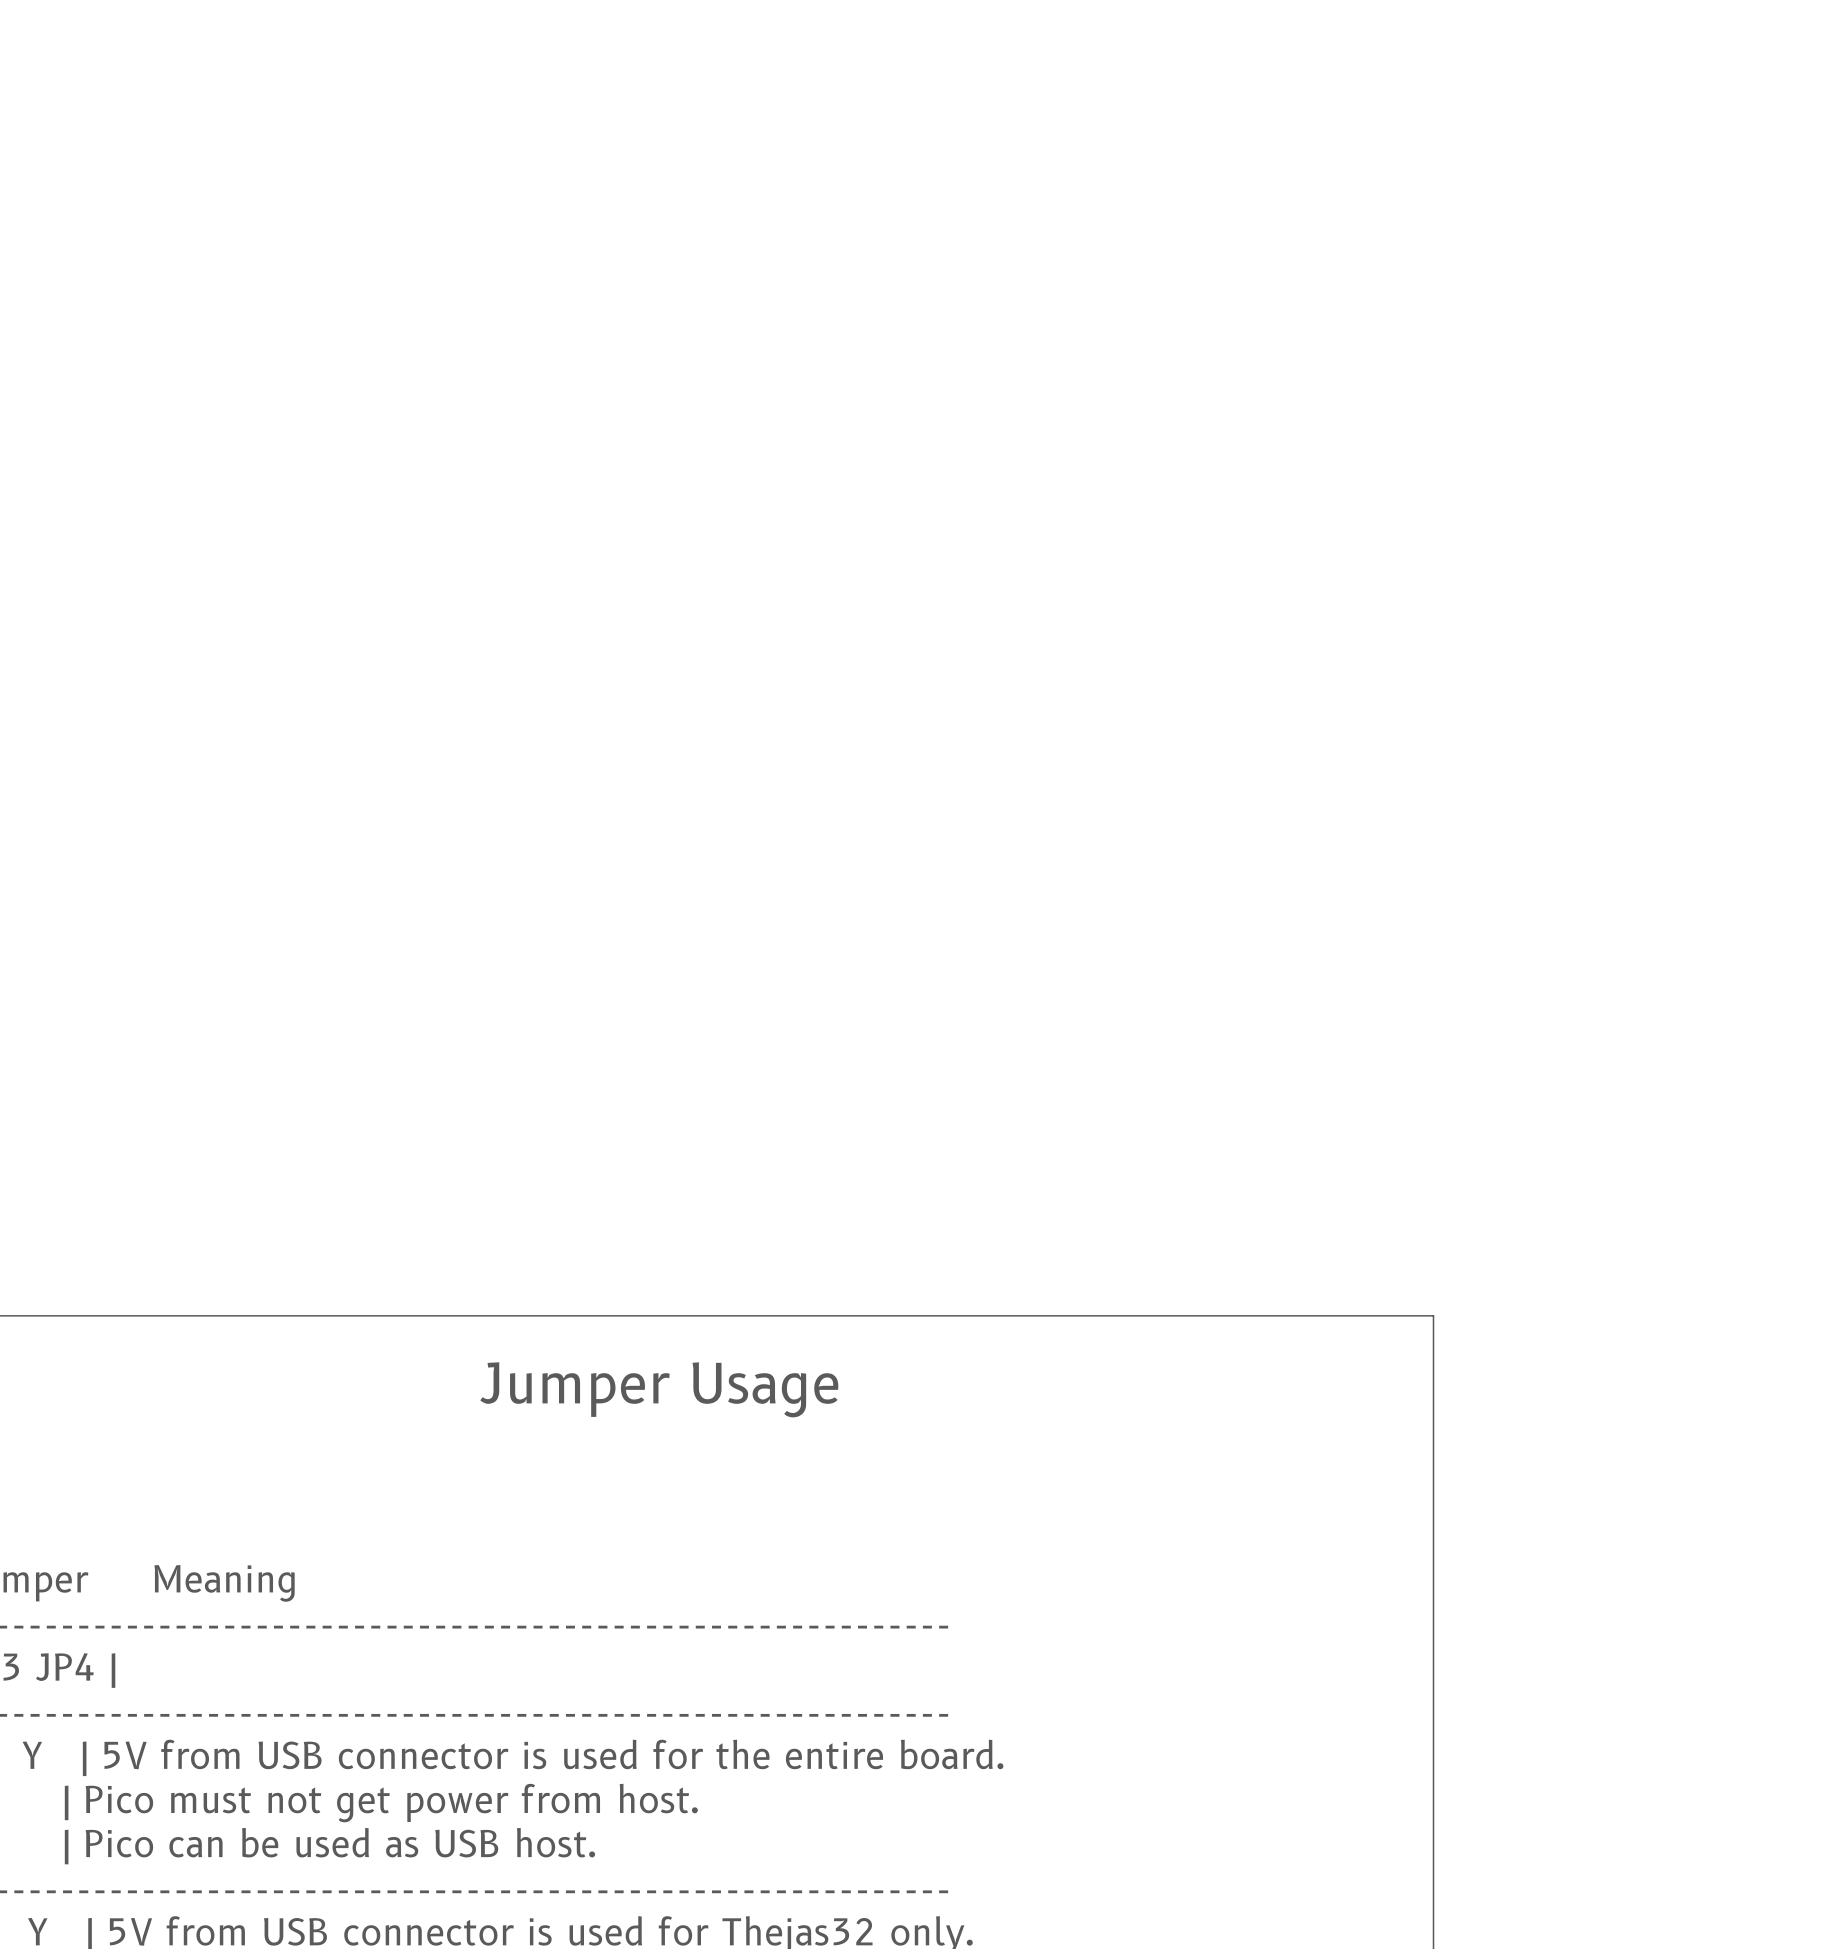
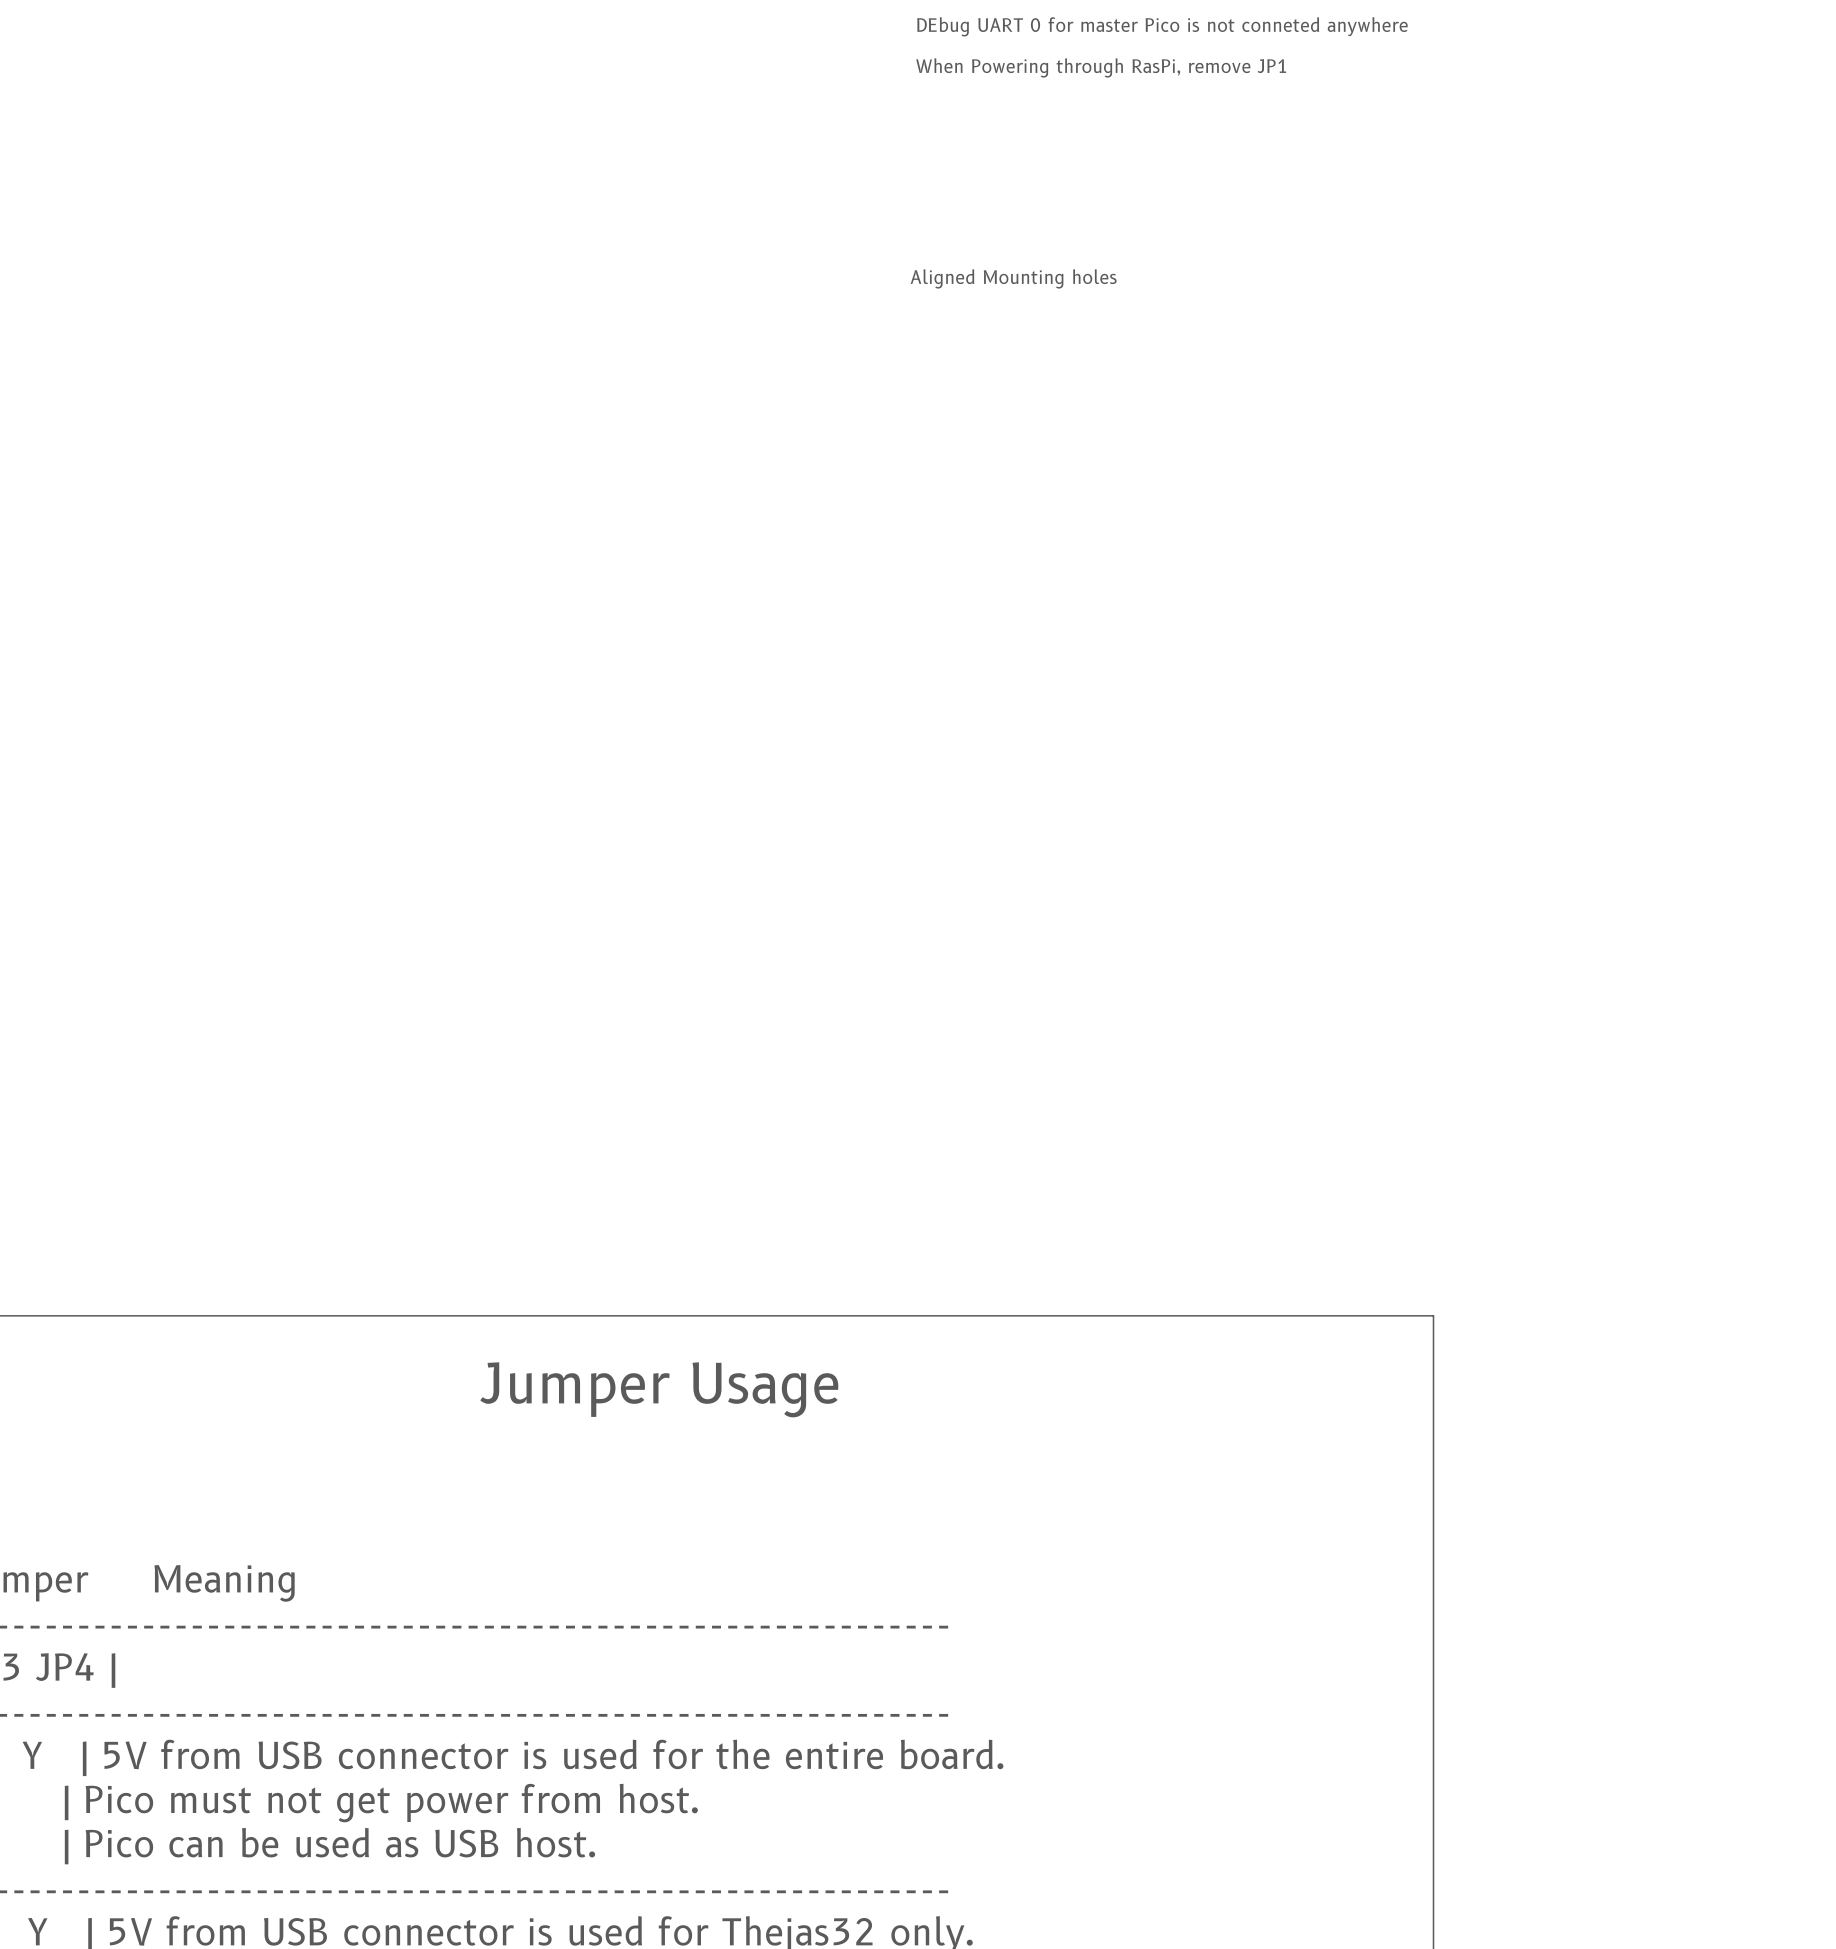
text: none -> DEbug UART 0 for master Pico is not conneted anywhere (1162, 26)
text: none -> When Powering through RasPi, remove JP1 (1101, 67)
text: none -> Aligned Mounting holes (1013, 278)

